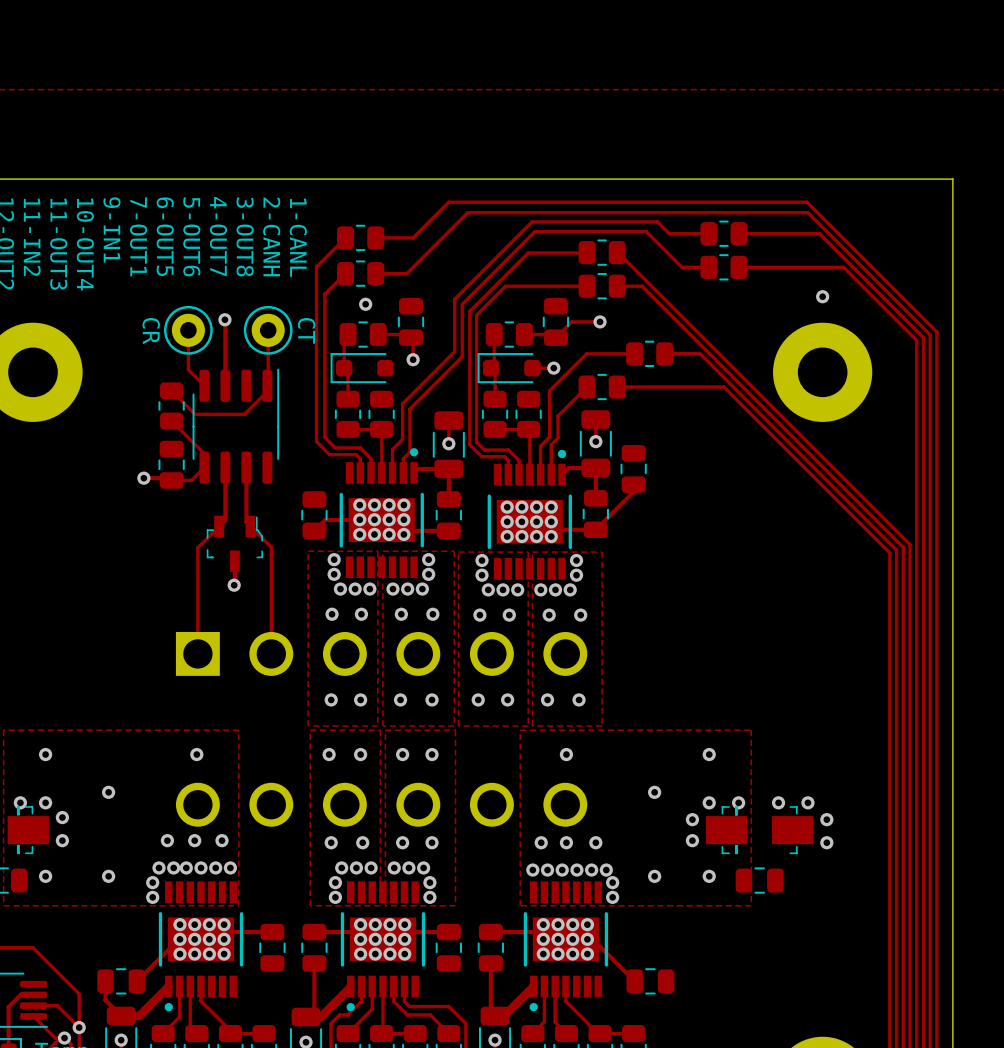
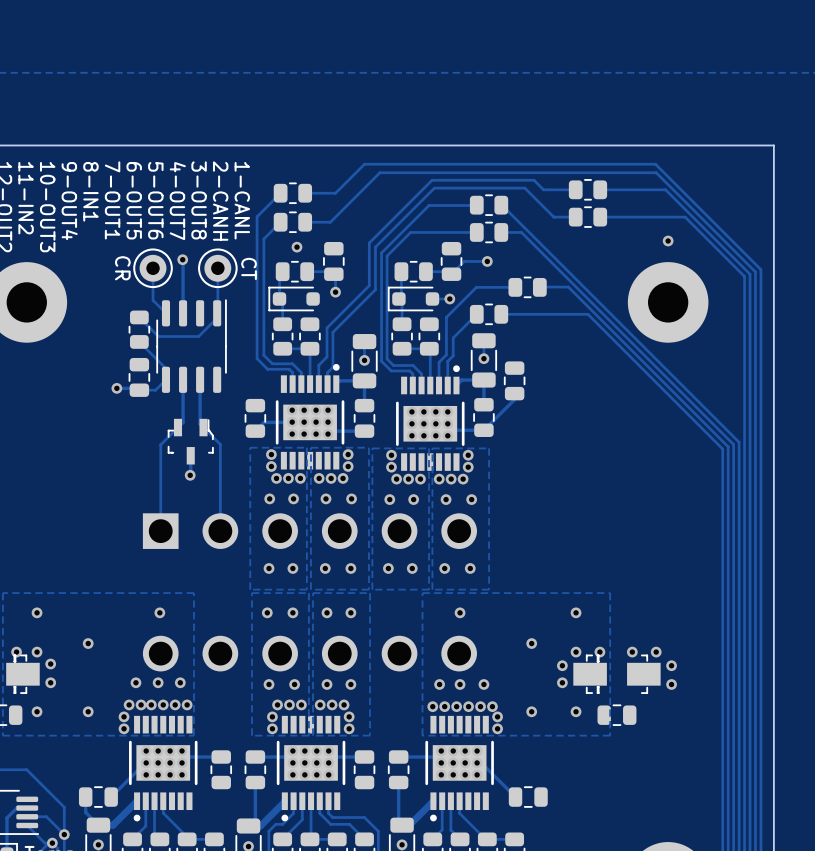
text: 9-IN1 (111, 229) -> 8-IN1 (90, 191)
text: 11-OUT3 (58, 244) -> 10-OUT3 (47, 207)
text: 10-OUT4 (85, 244) -> 9-OUT4 (69, 201)

